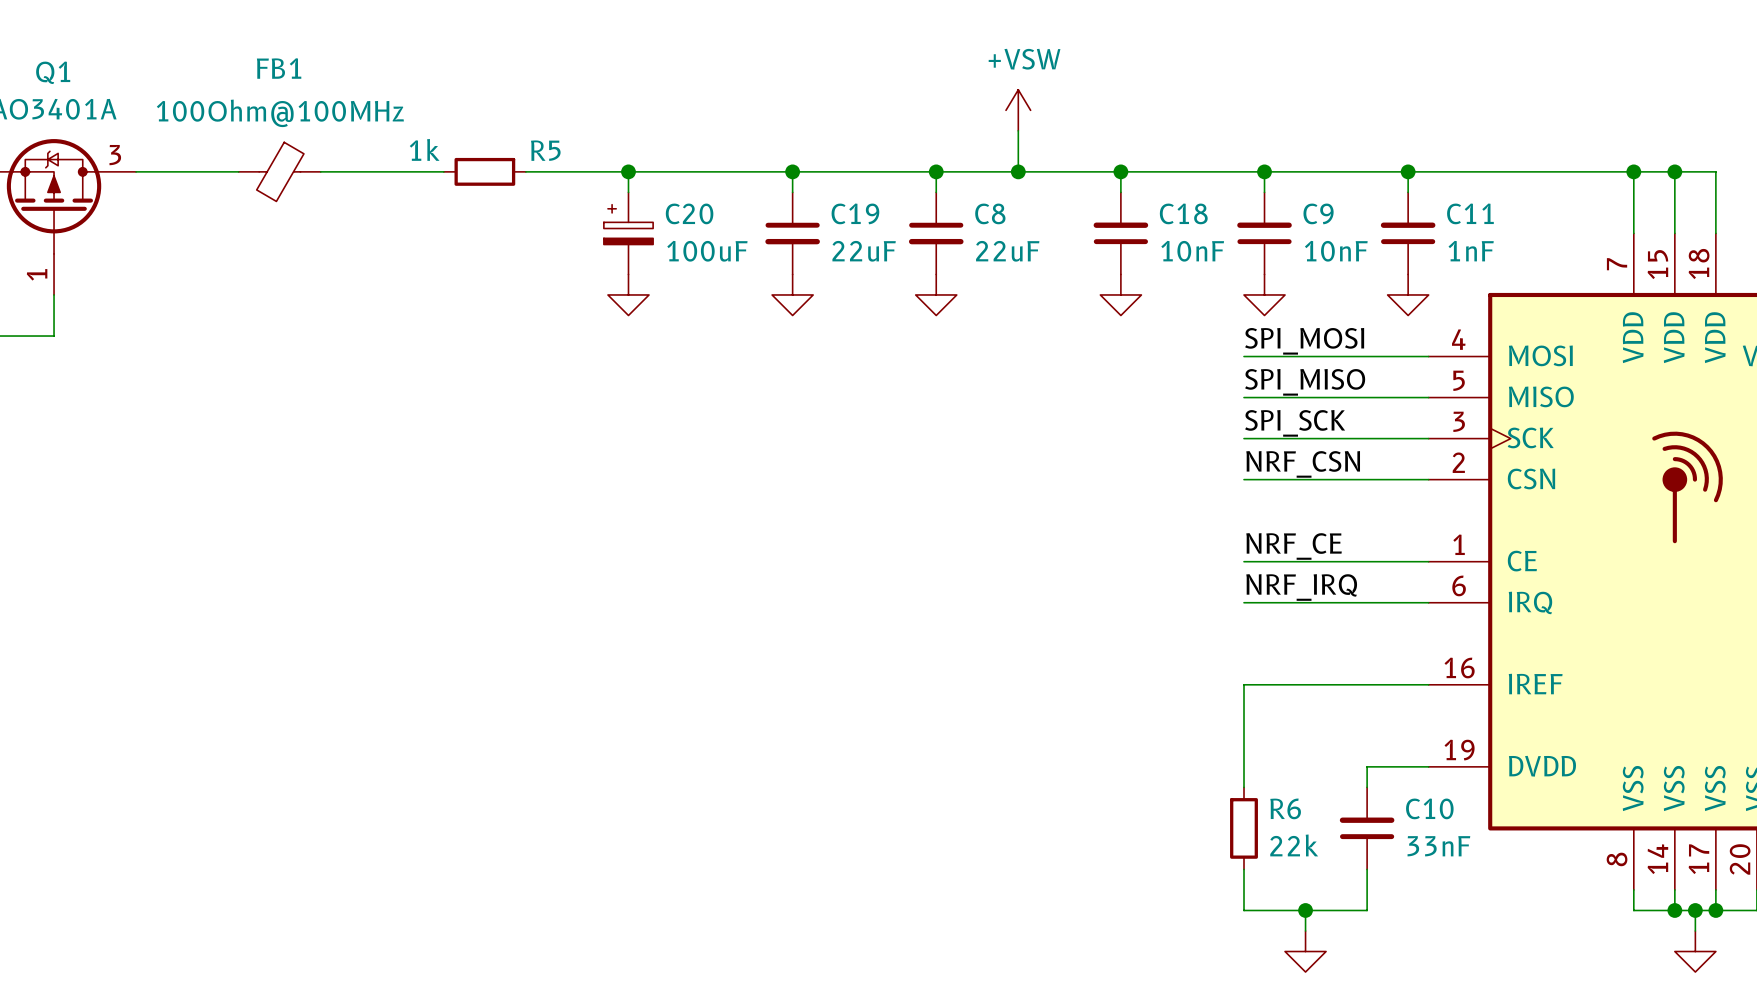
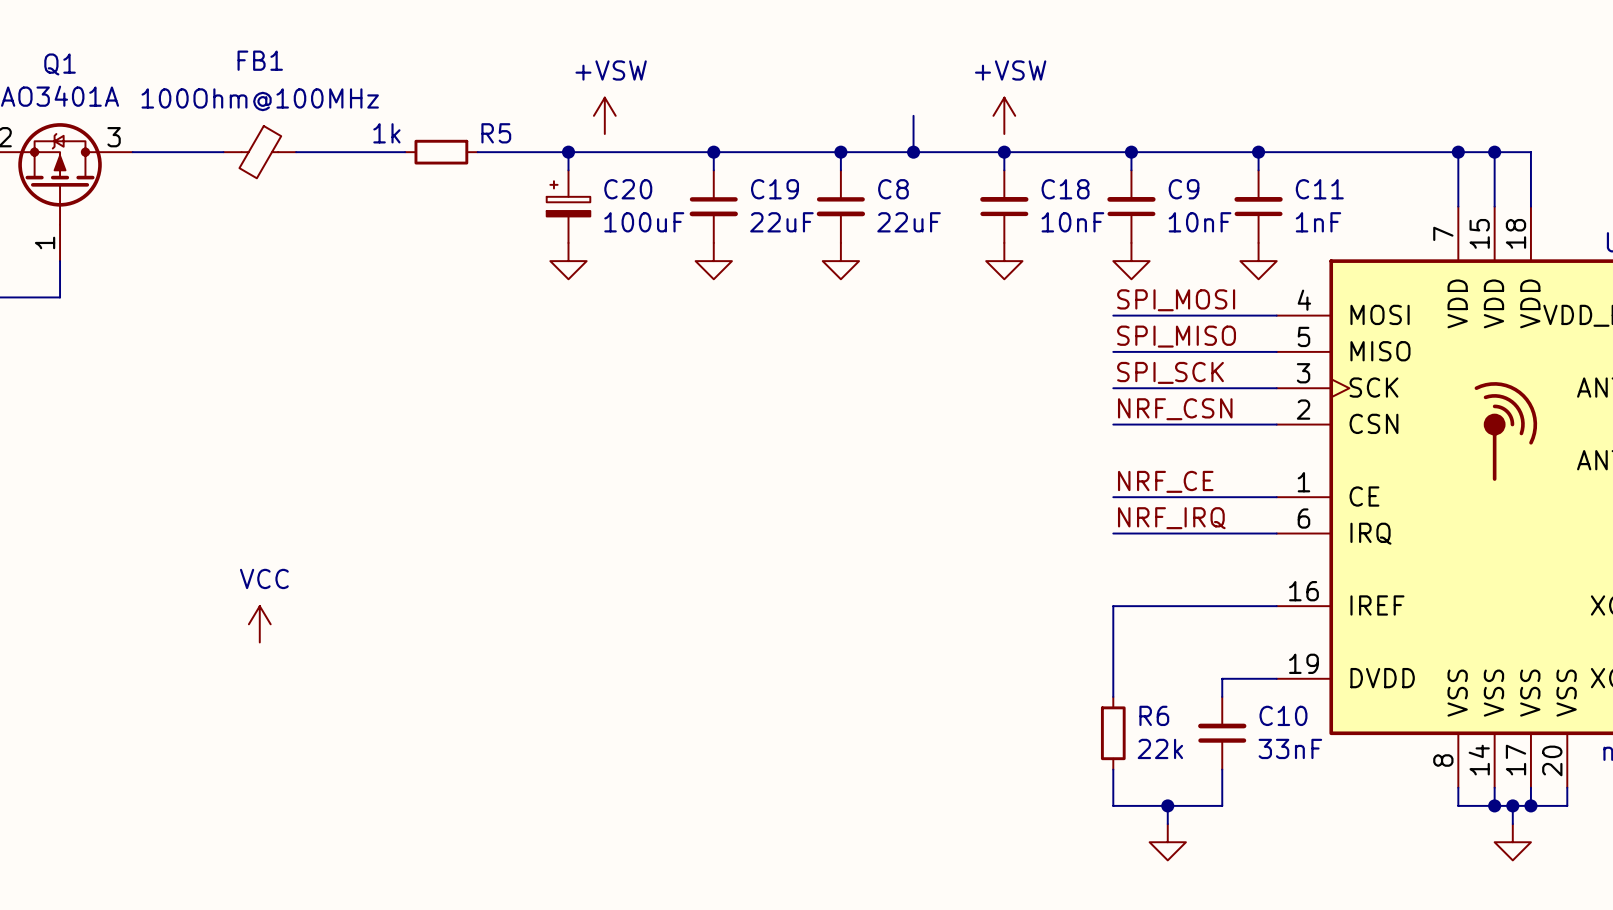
power symbol position: +VSW (1018, 110) -> +VSW (1004, 115)
power symbol: none -> +VSW (604, 115)
power symbol: none -> VCC (259, 624)

